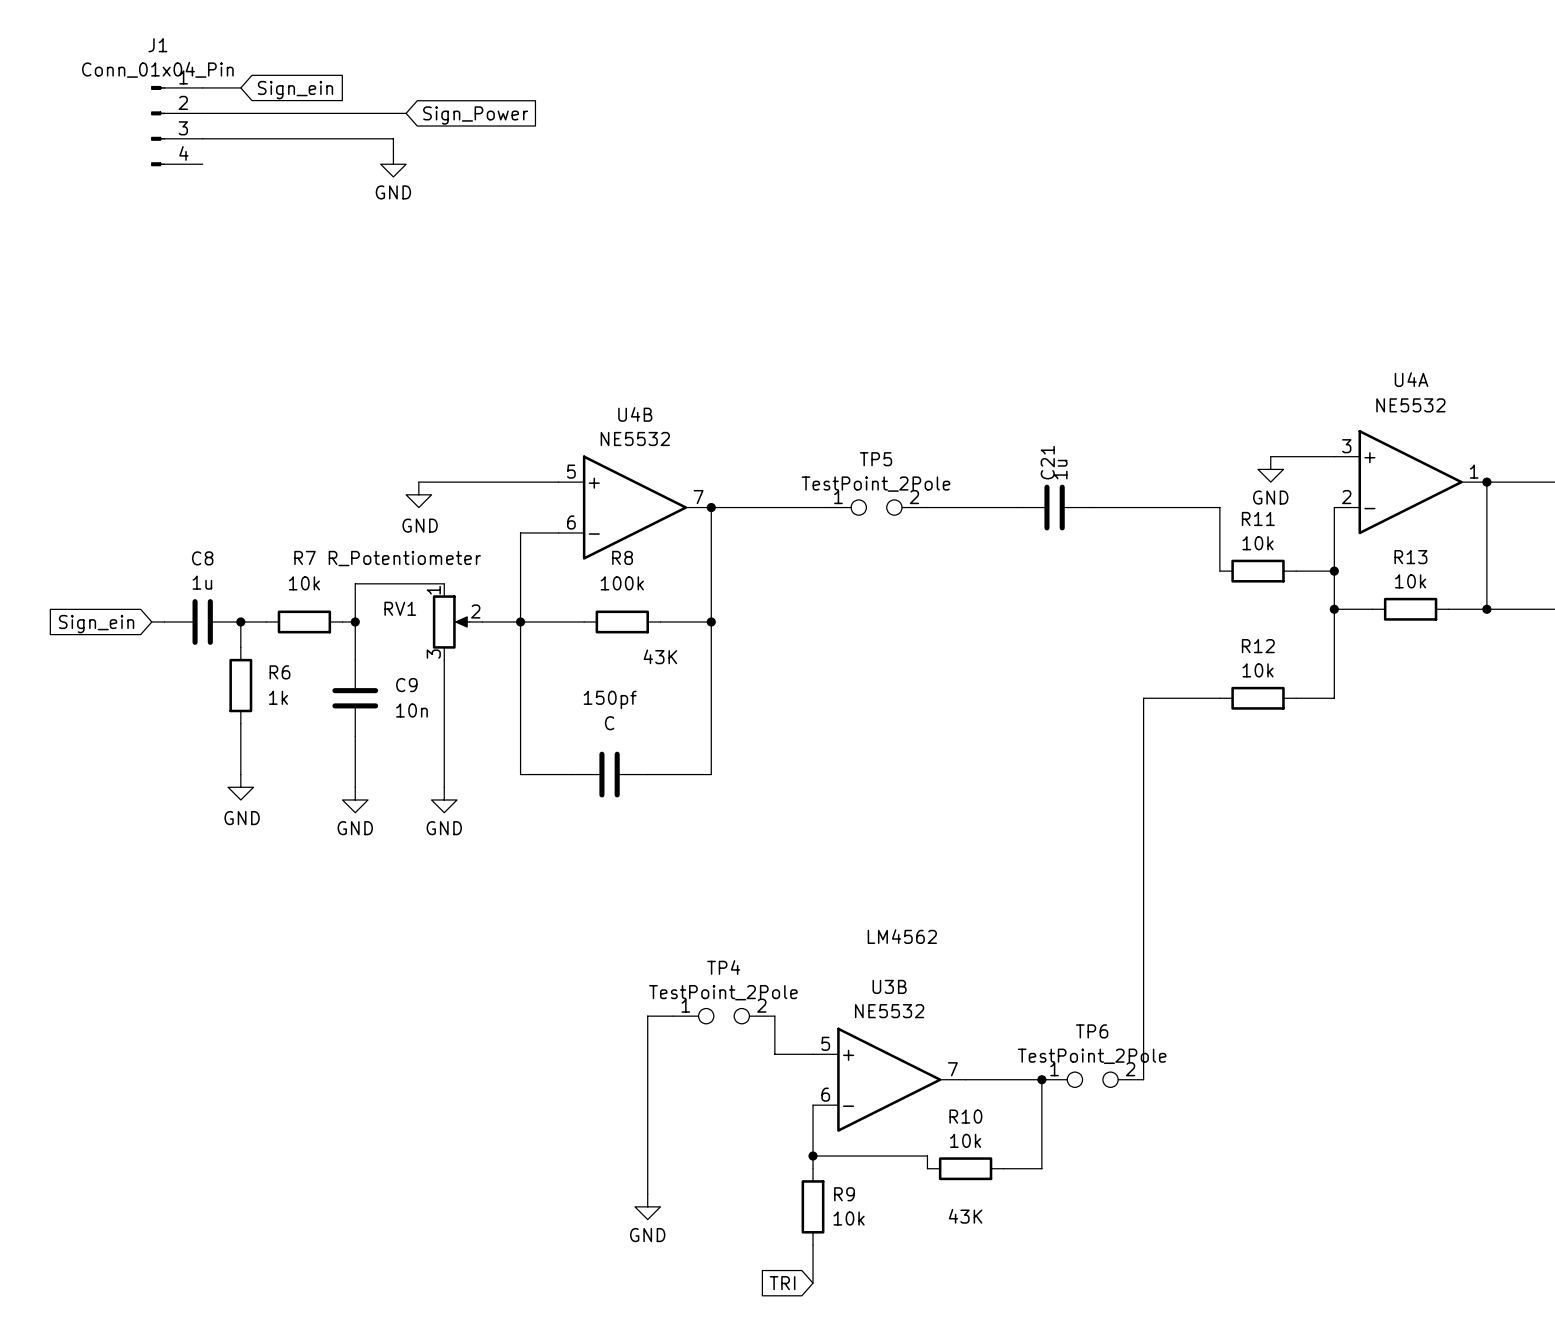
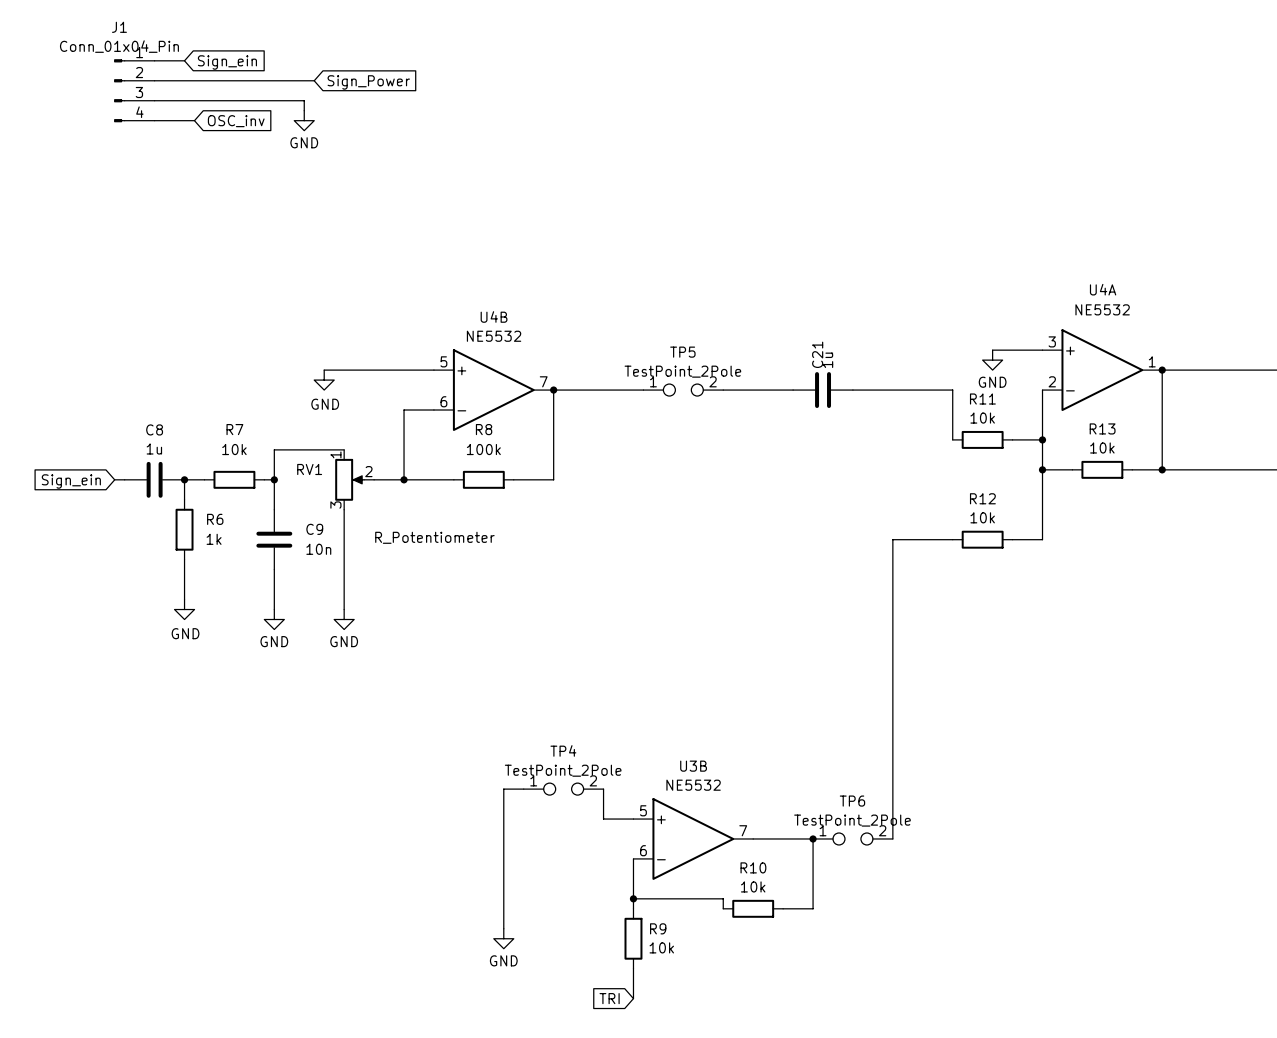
wire: none -> (154, 120) (194, 120)
global label: none -> OSC_inv (236, 121)
RV1 value position: R_Potentiometer (404, 558) -> R_Potentiometer (434, 537)
wire: (520, 621) (520, 774) (571, 774) -> none
wire: (711, 621) (711, 774) (647, 774) -> none
junction: (711, 621) -> none
text: 43K (660, 656) -> none
150pf: C (609, 774) -> none
text: LM4562 (902, 936) -> none
text: 43K (965, 1216) -> none

